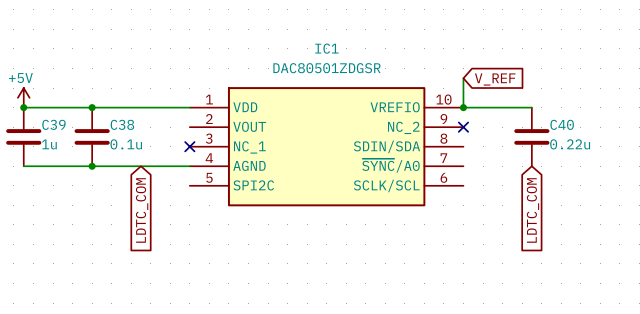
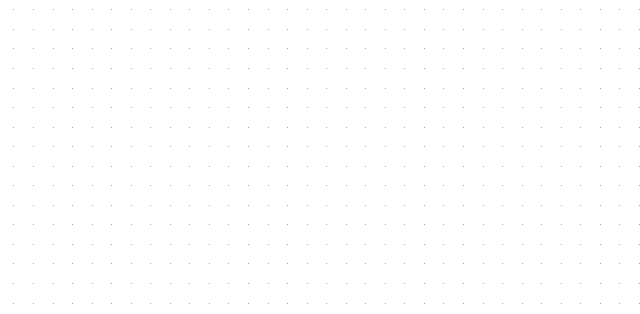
wire: (463, 78) (463, 107) (531, 107) -> none
global label: V_REF (495, 79) -> none
power symbol: +5V (23, 97) -> none
wire: (23, 107) (189, 107) -> none
junction: (23, 107) -> none
junction: (92, 107) -> none
junction: (463, 107) -> none
no-connect mark: (463, 127) -> none
C39: 1u (23, 136) -> none
C38: 0.1u (92, 136) -> none
C40: 0.22u (531, 136) -> none
no-connect mark: (189, 146) -> none
IC1: DAC80501ZDGSR (326, 146) -> none
wire: (23, 166) (189, 166) -> none
junction: (92, 166) -> none
global label: LDTC_COM (142, 210) -> none
global label: LDTC_COM (532, 210) -> none

